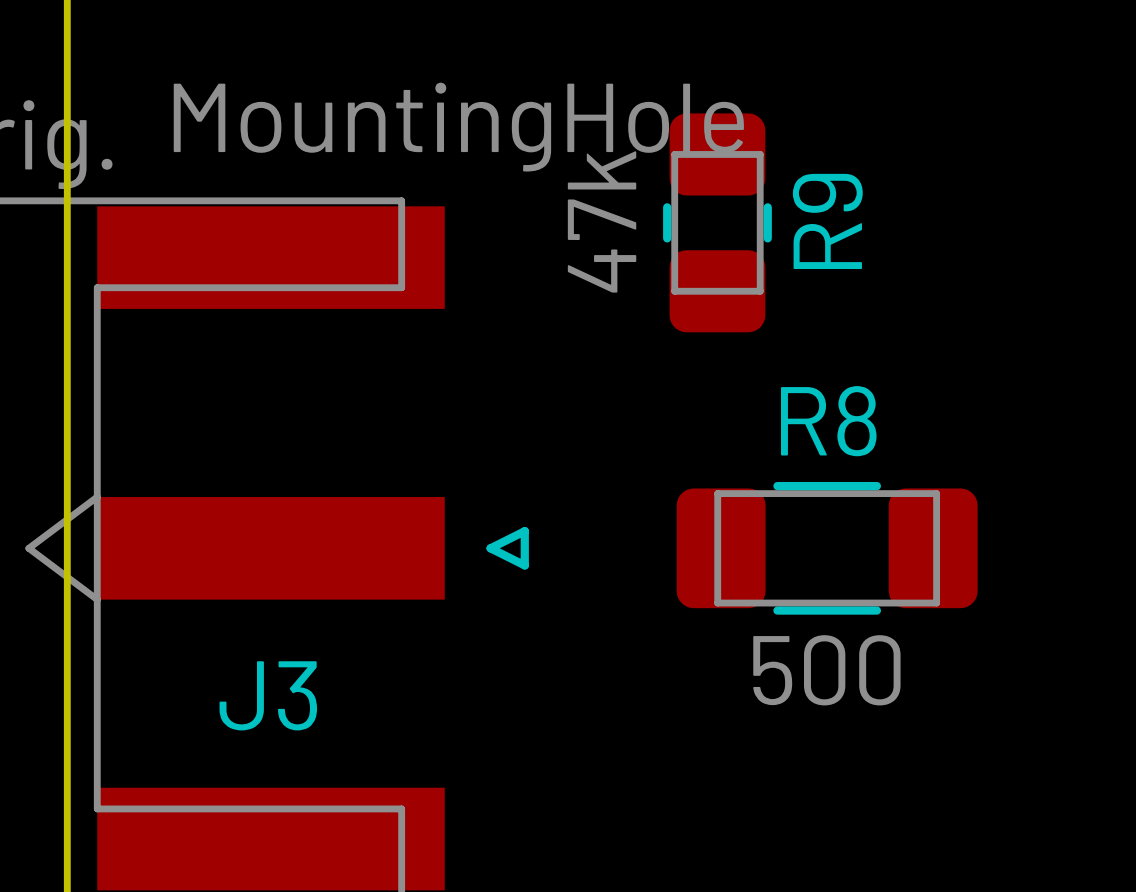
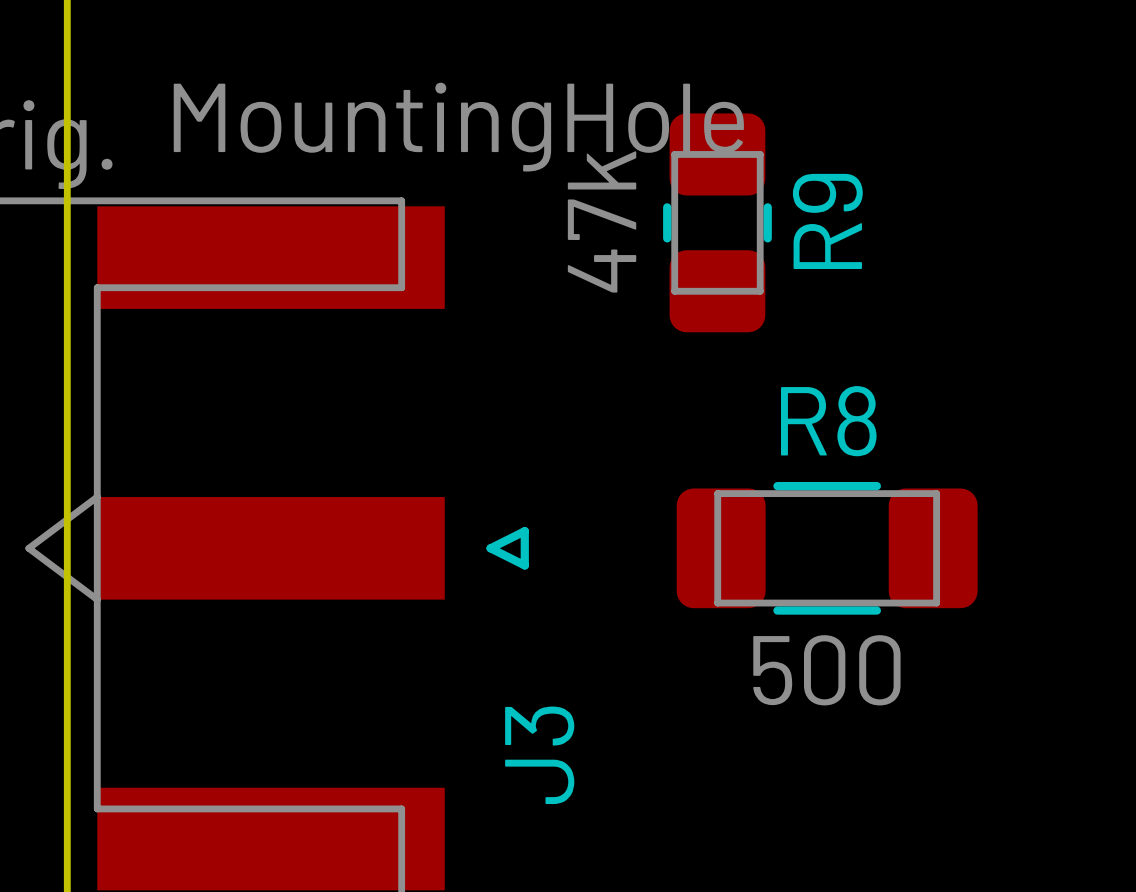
J3 name rotation: 0° (268, 695) -> 90° counterclockwise (539, 755)
J3 name position: J3 (268, 695) -> J3 (539, 755)

